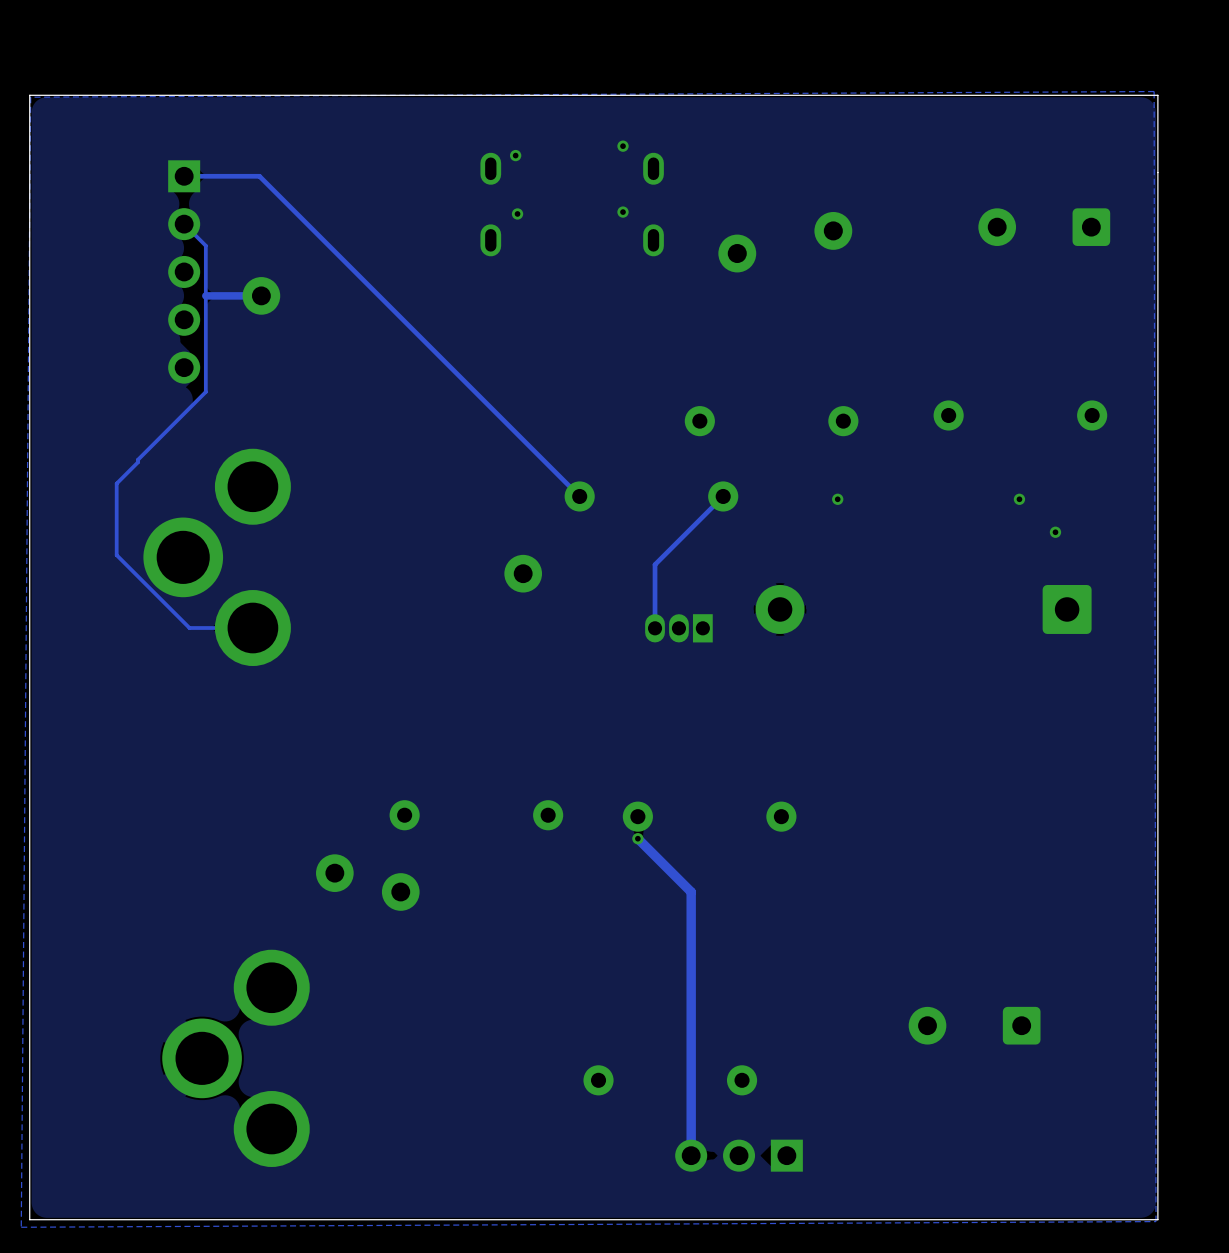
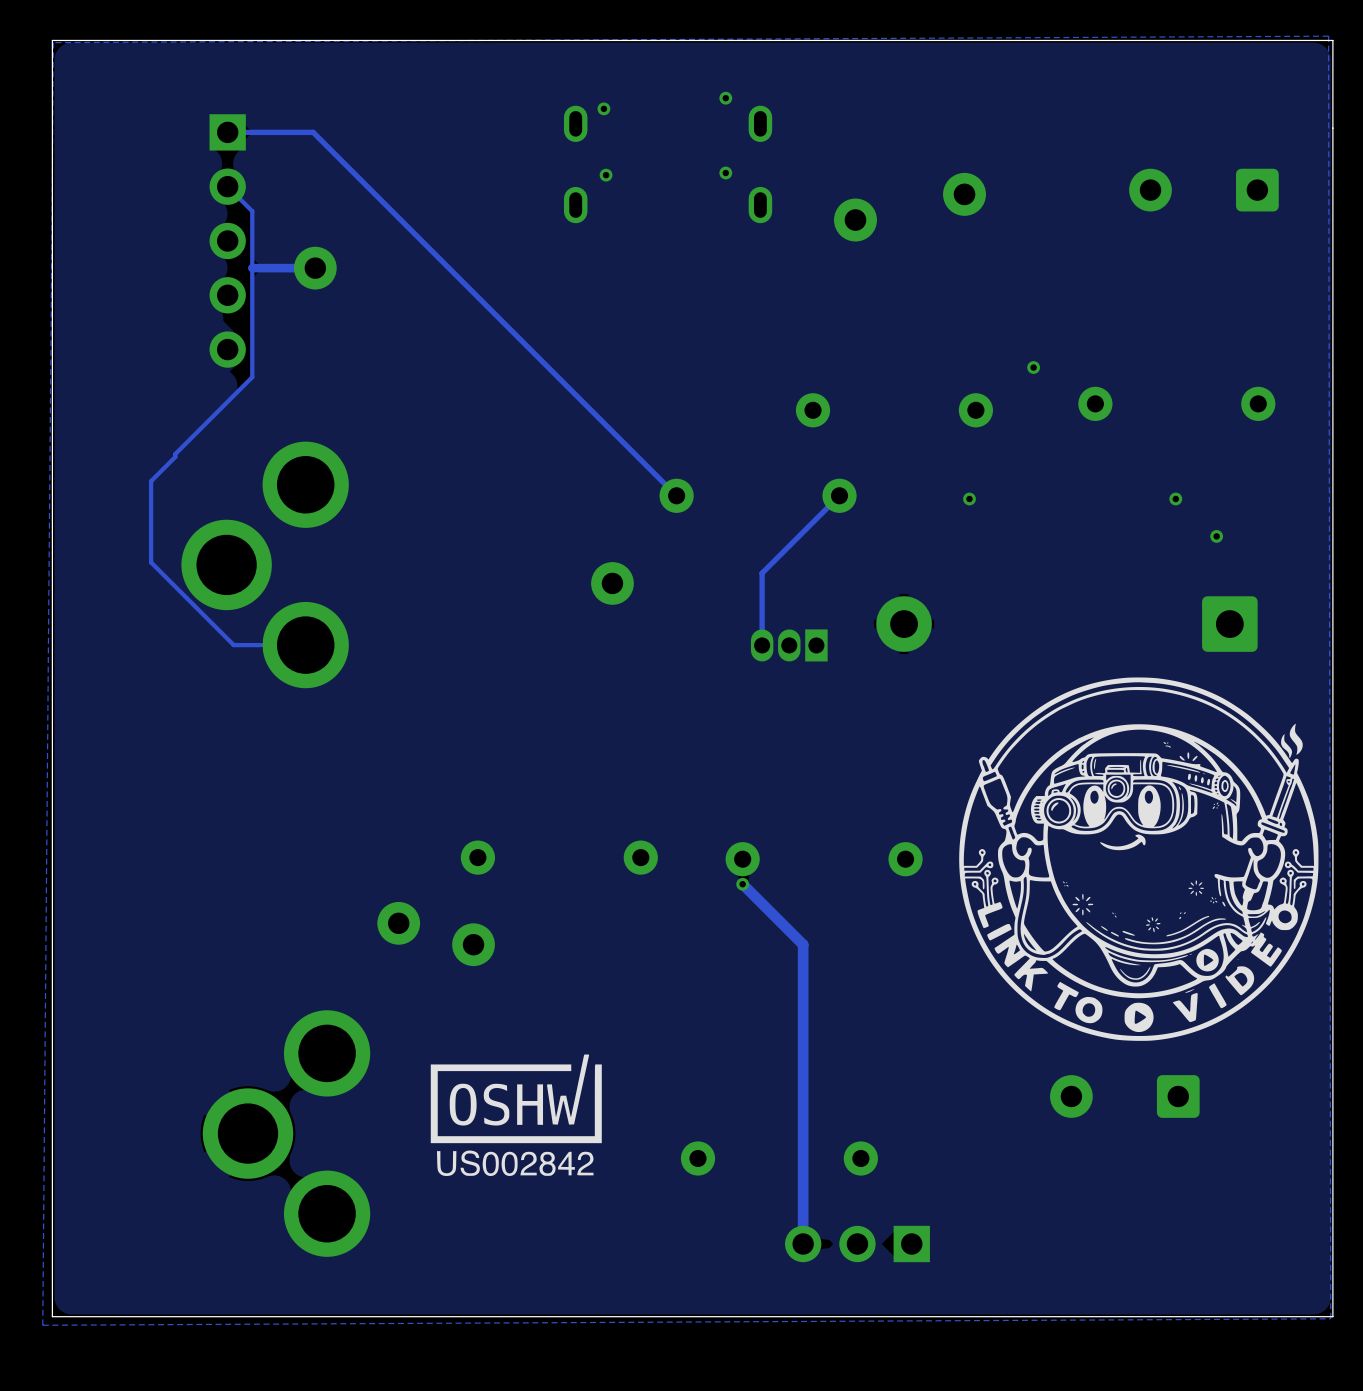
via: none -> (1033, 367)
drawing: none -> [959, 677, 1319, 1041]
drawing: none -> [430, 1054, 602, 1177]

